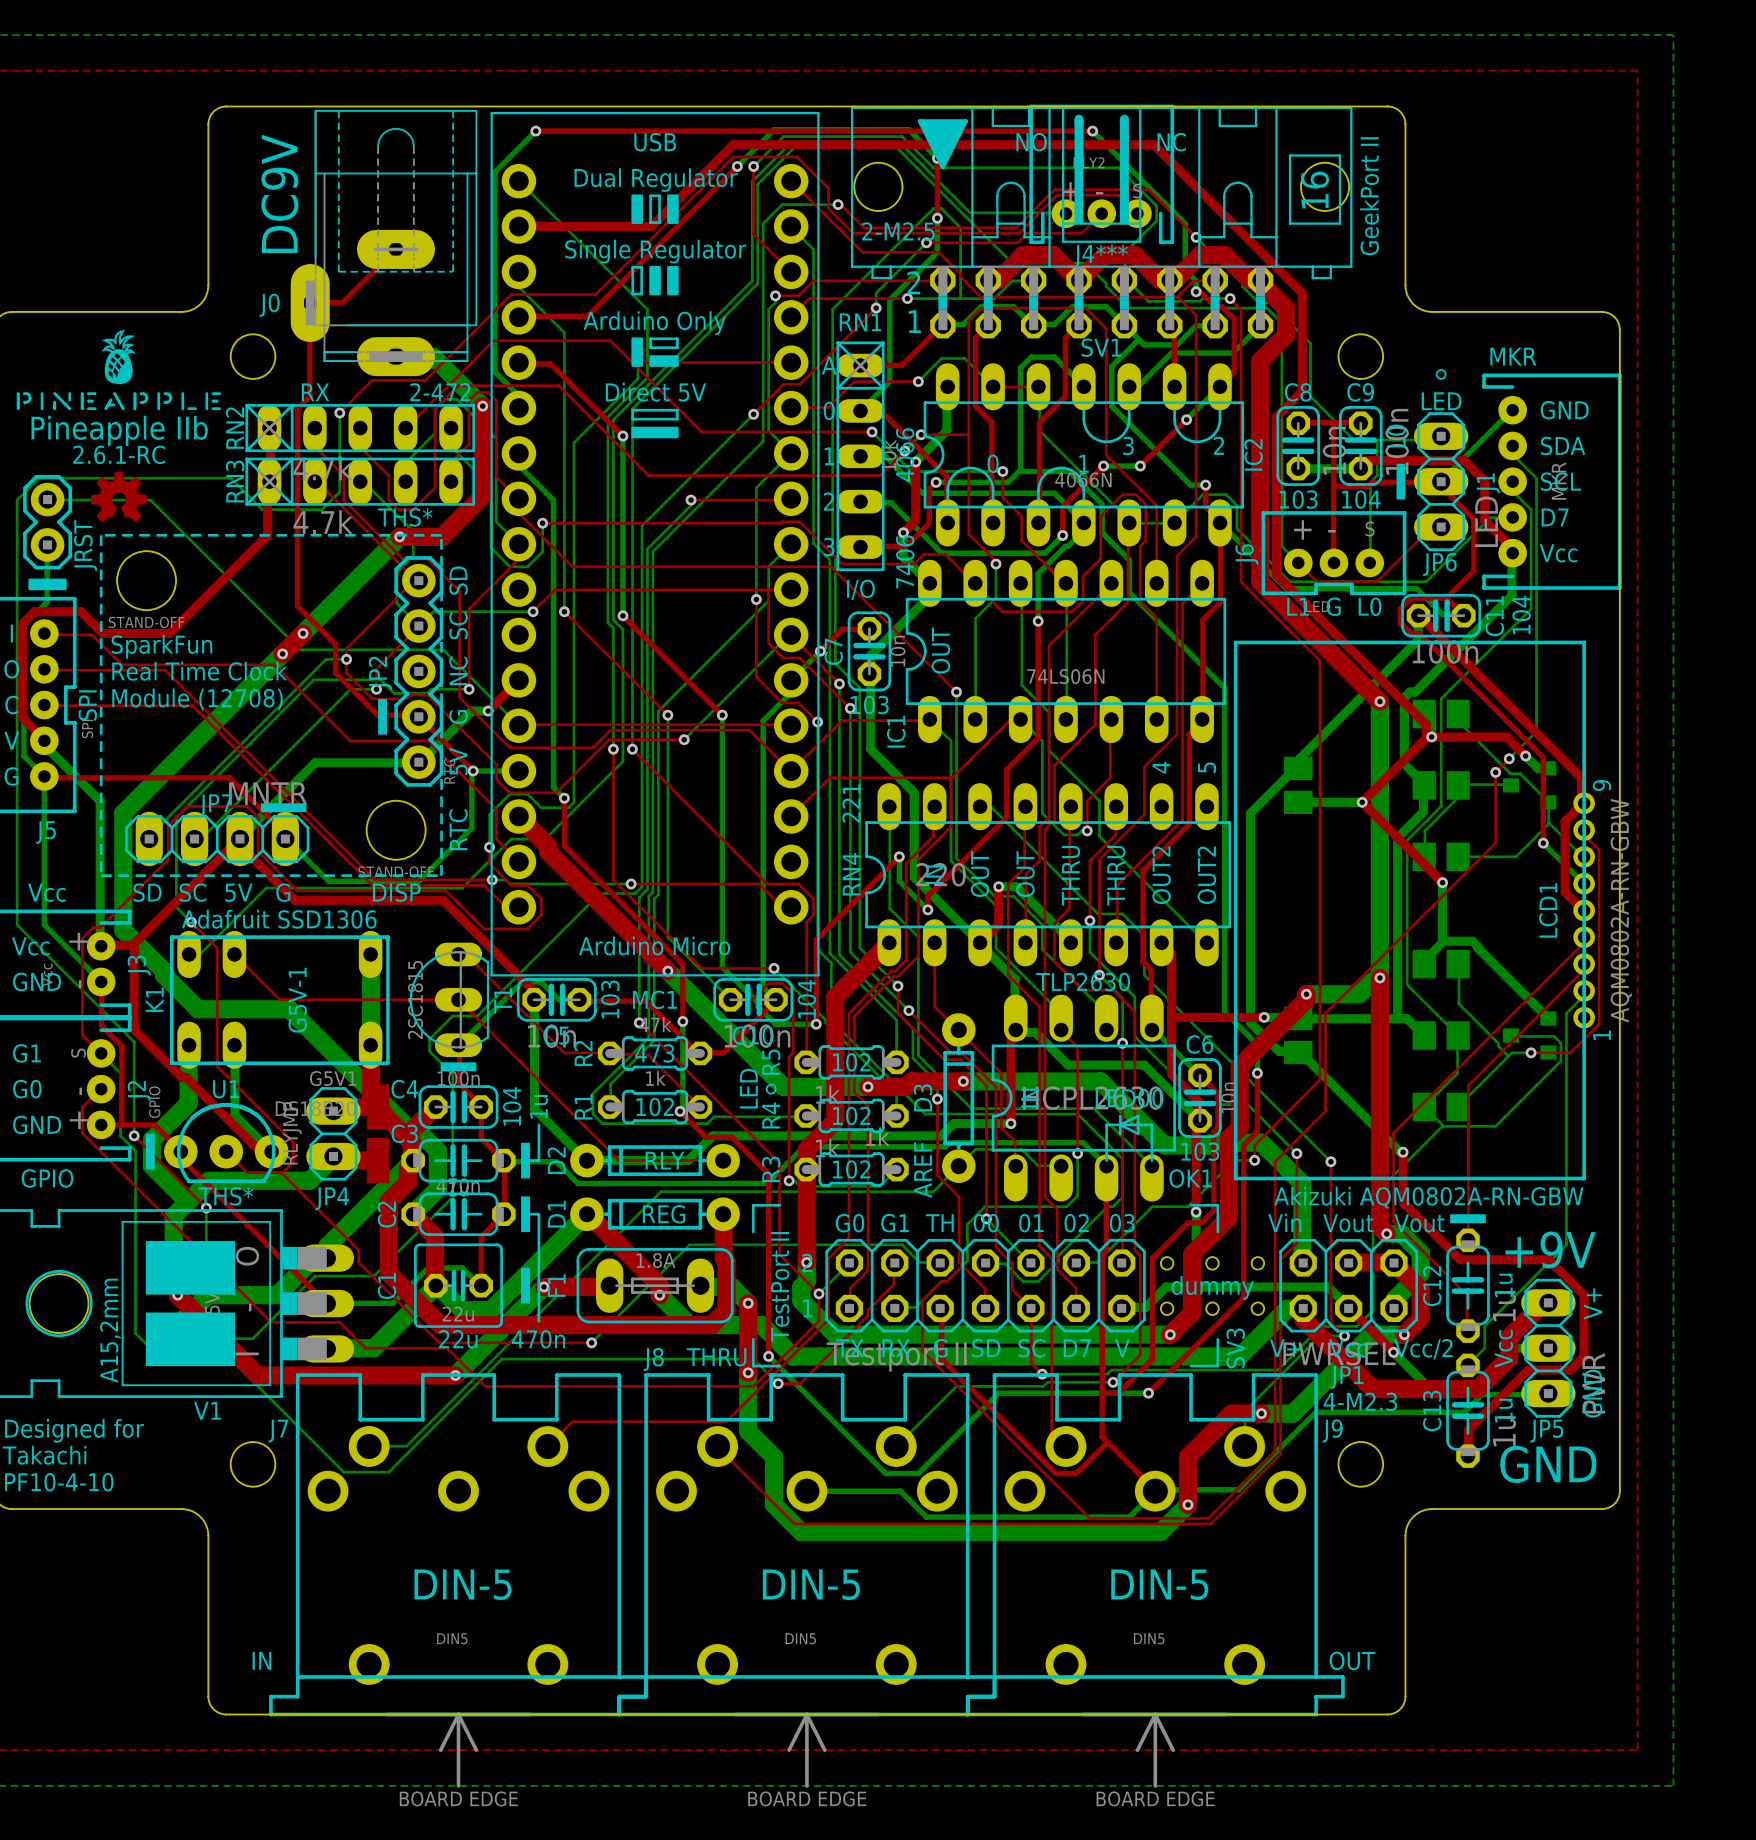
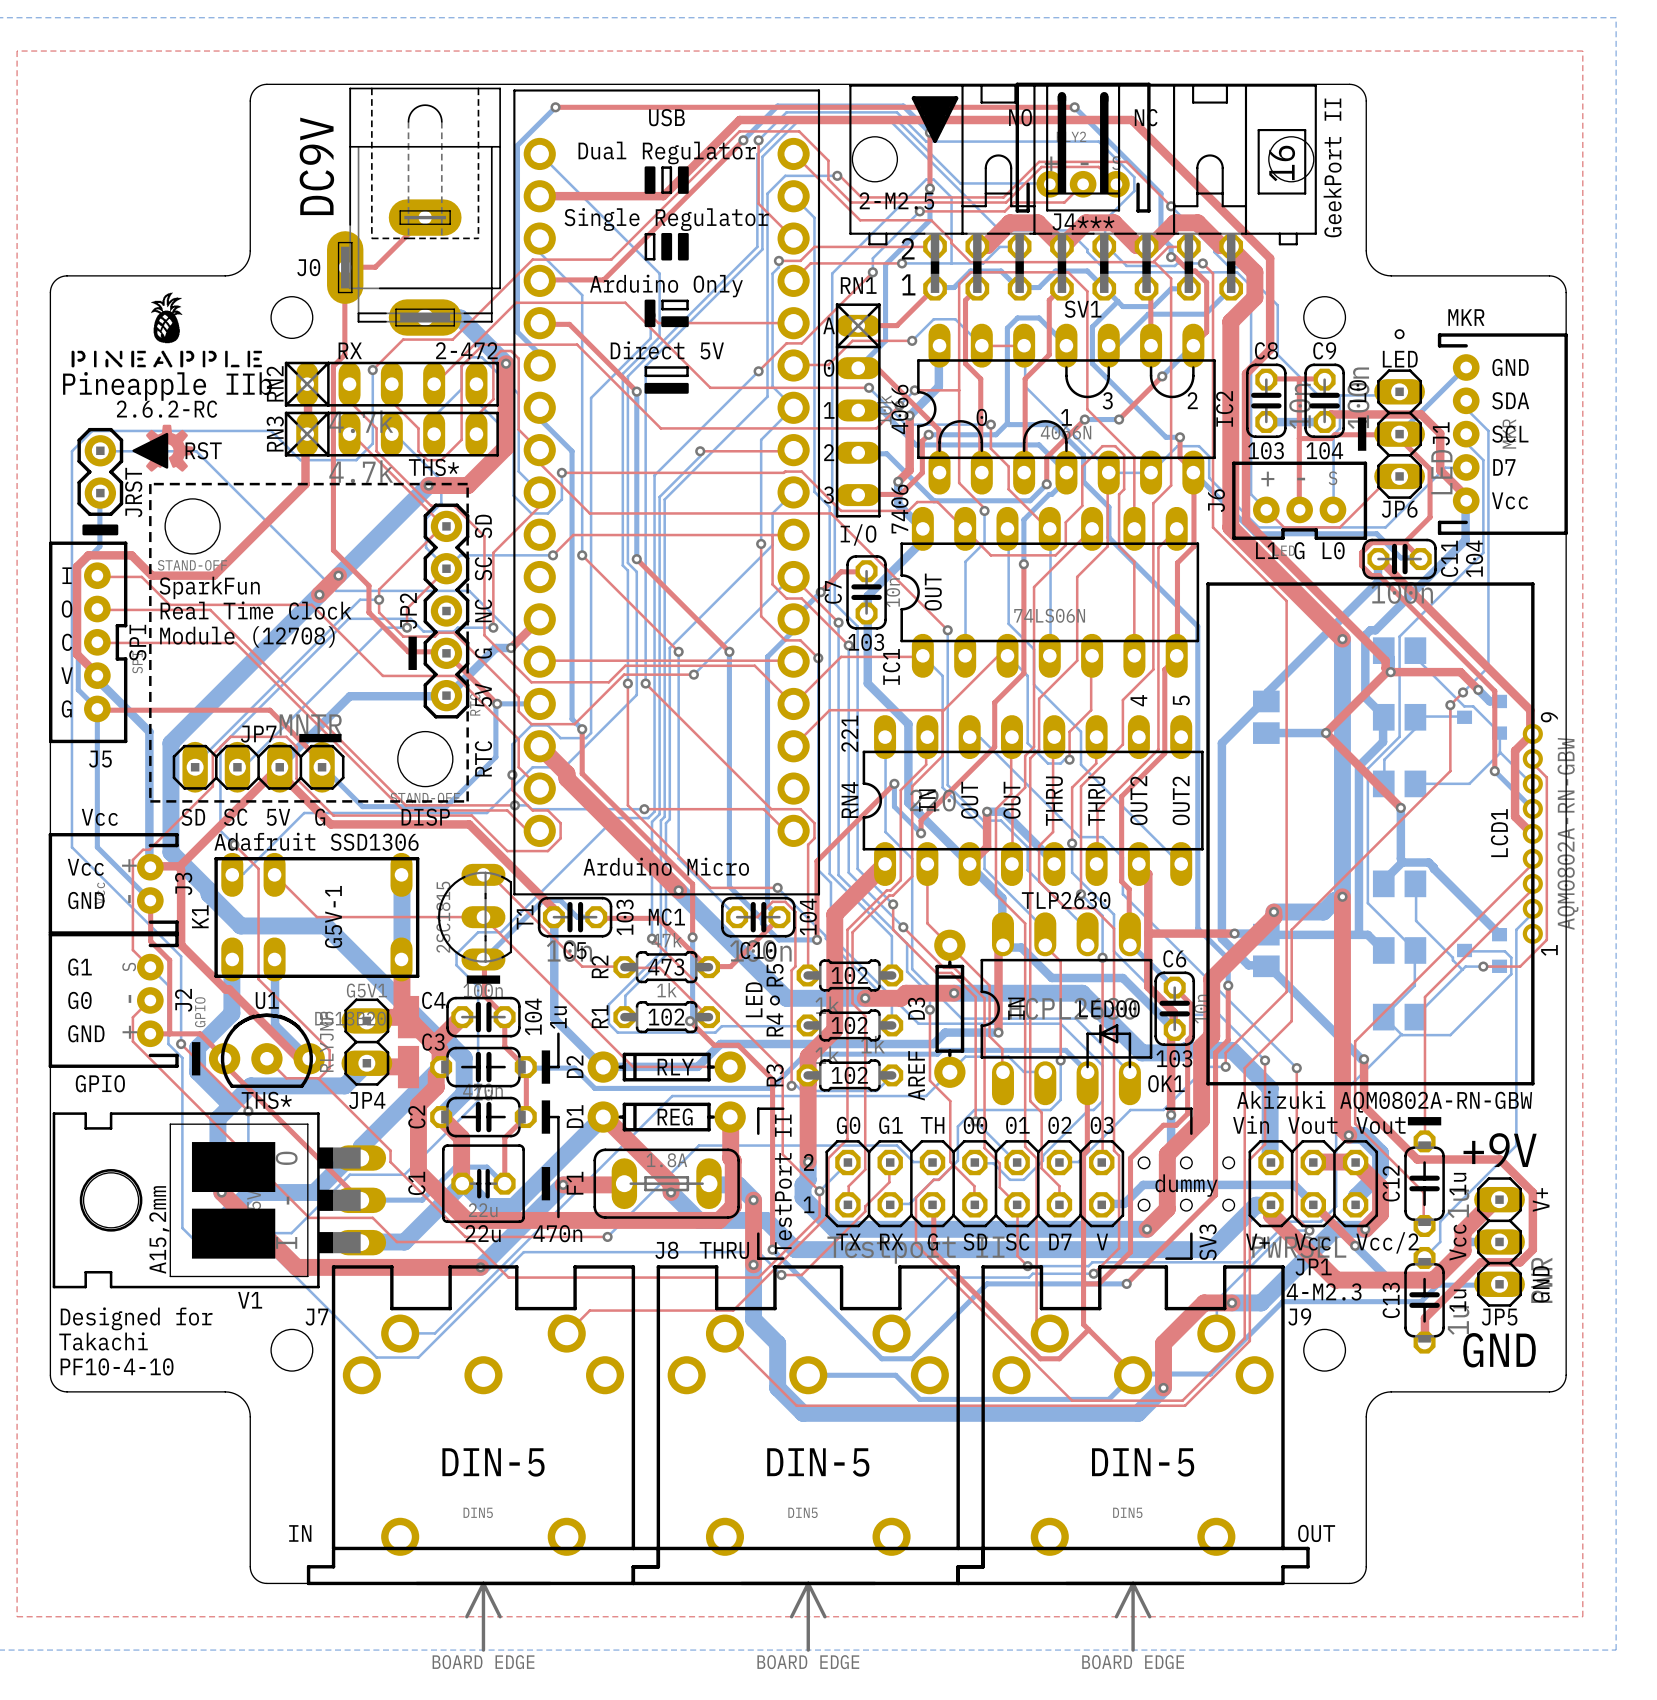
text: 2.6.1-RC (119, 454) -> 2.6.2-RC (167, 409)
drawing: none -> [132, 432, 169, 469]
text: none -> RST (203, 450)

